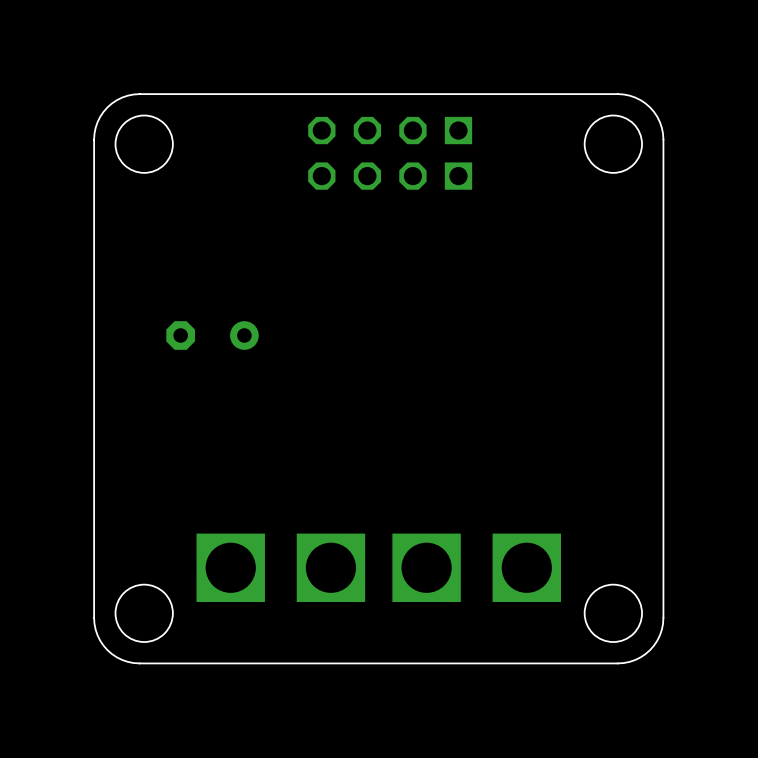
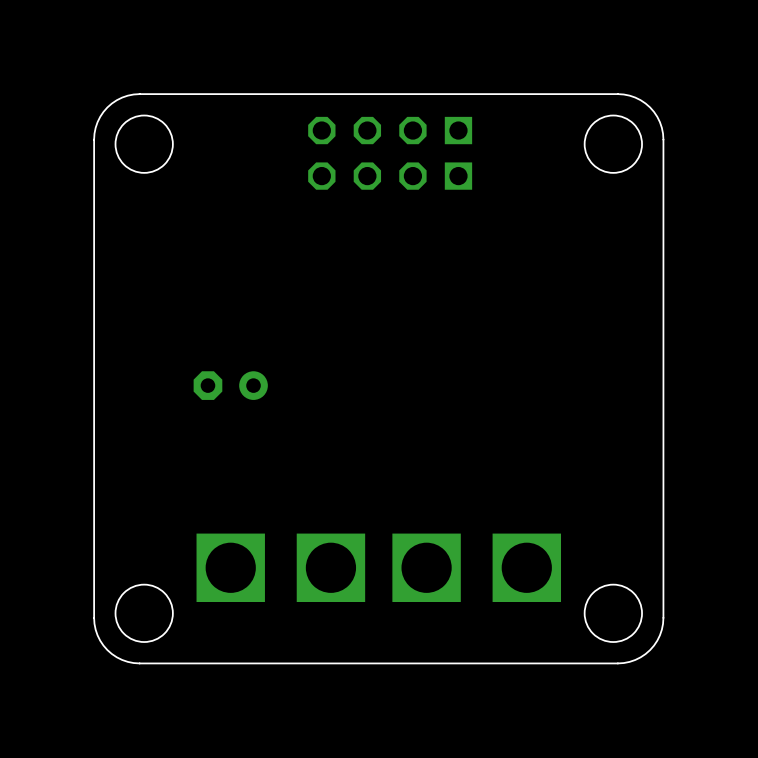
part: (212, 335) -> none
part: none -> (230, 385)

